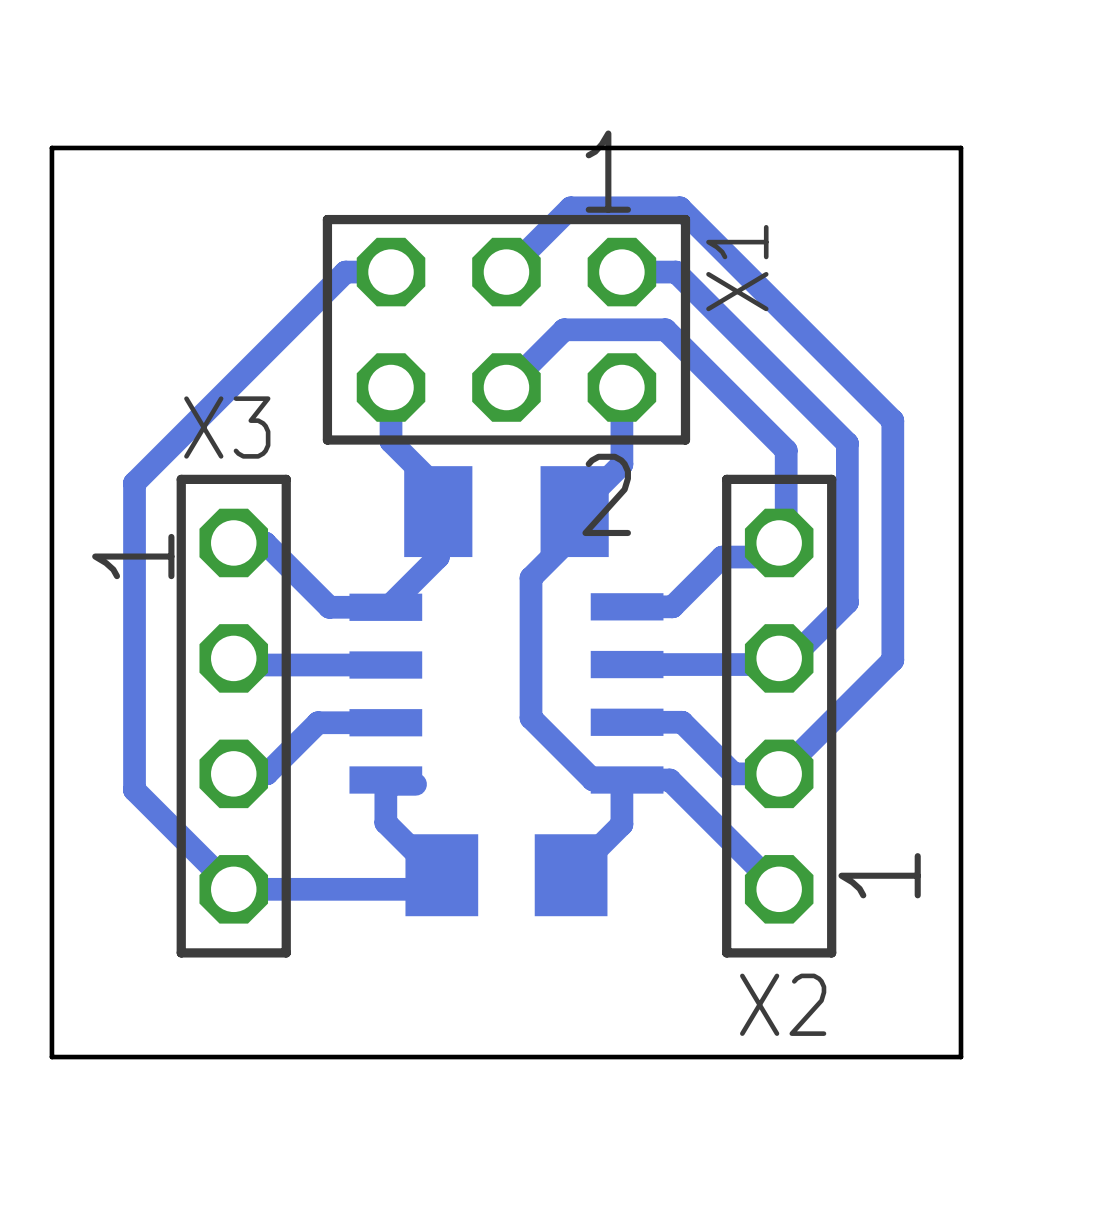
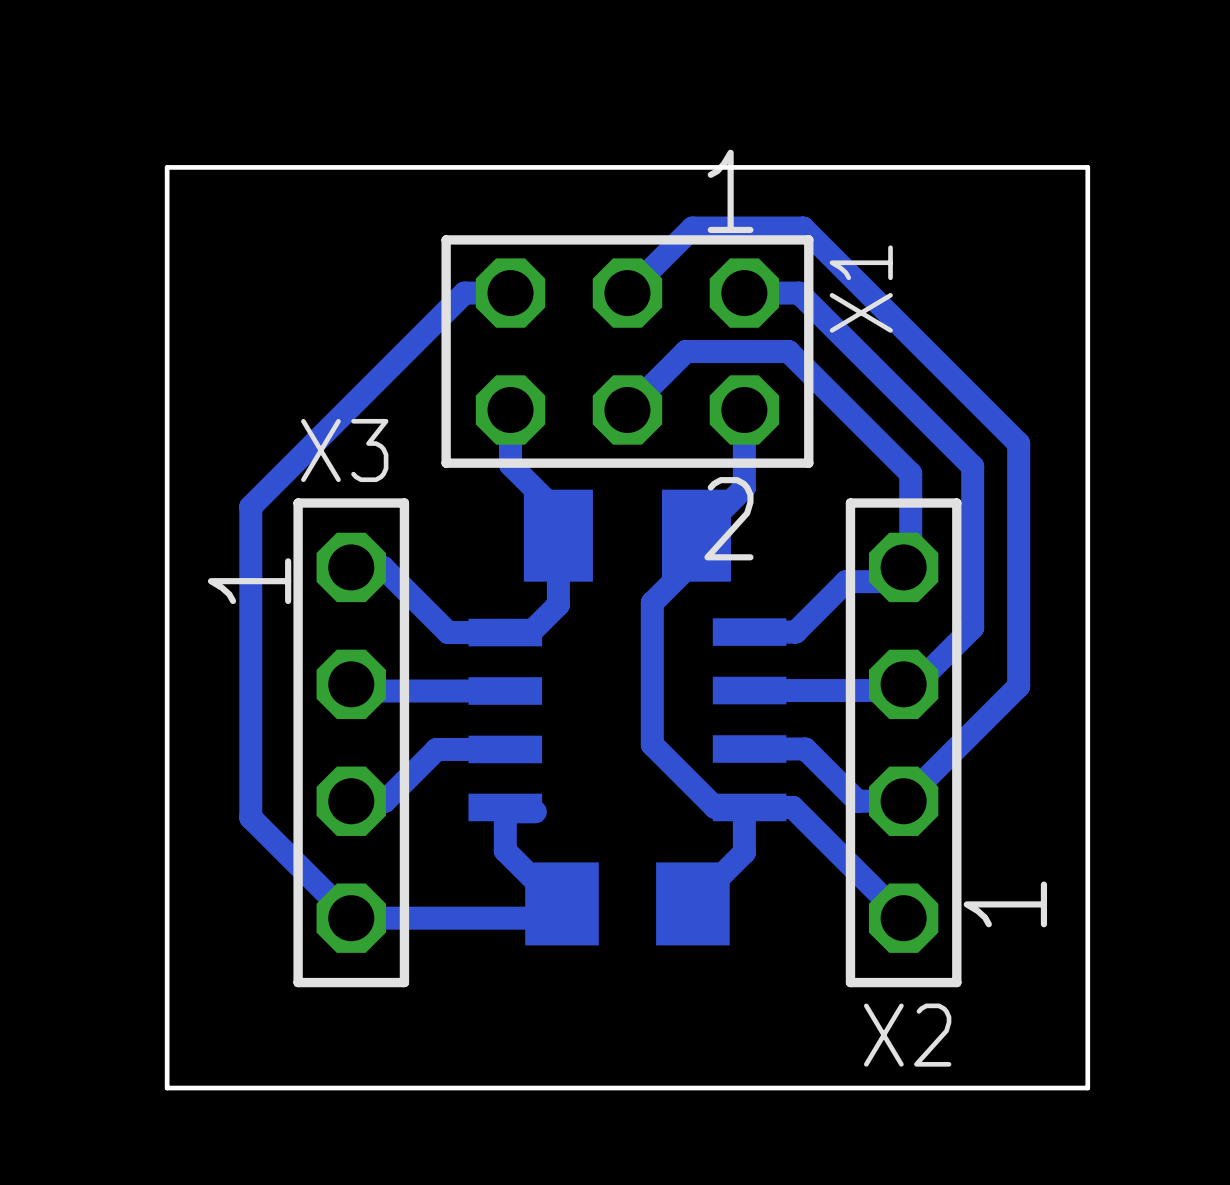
bottom track: (438, 557) (388, 607) -> (558, 581) (558, 604) (530, 632) (507, 632)

